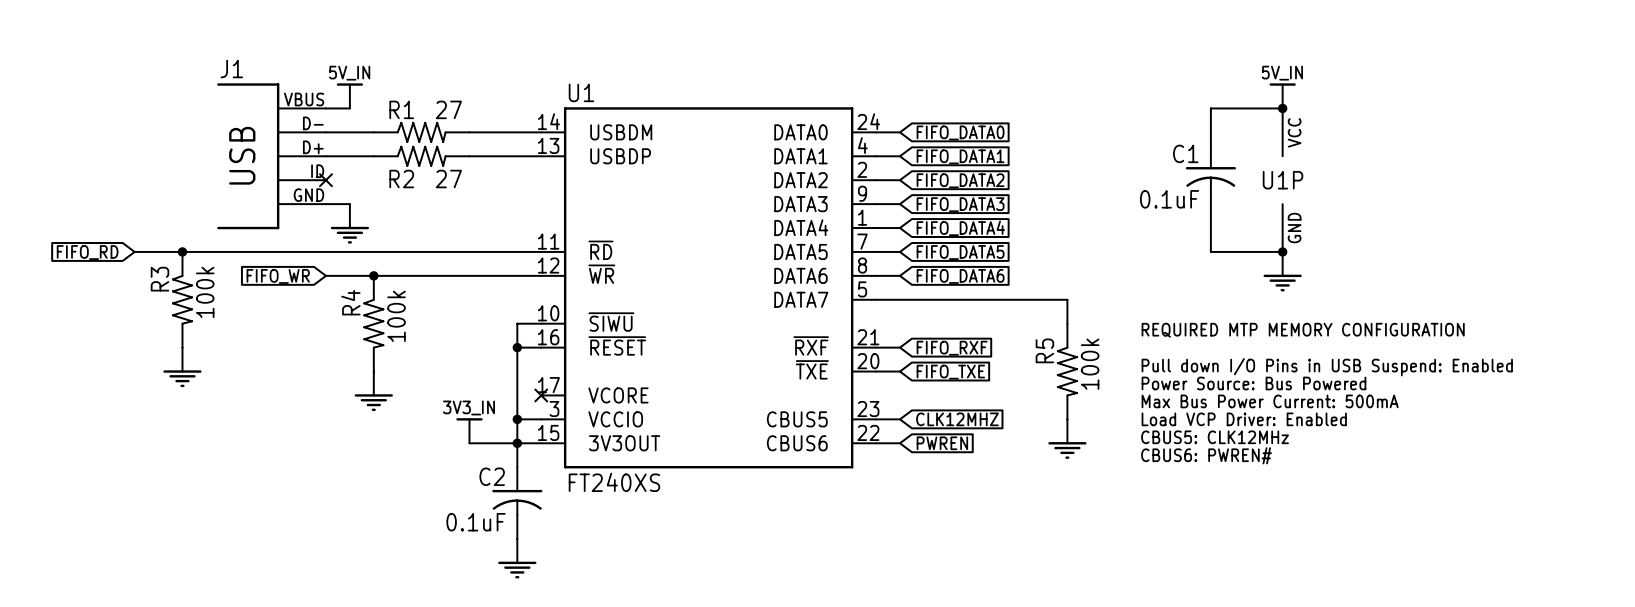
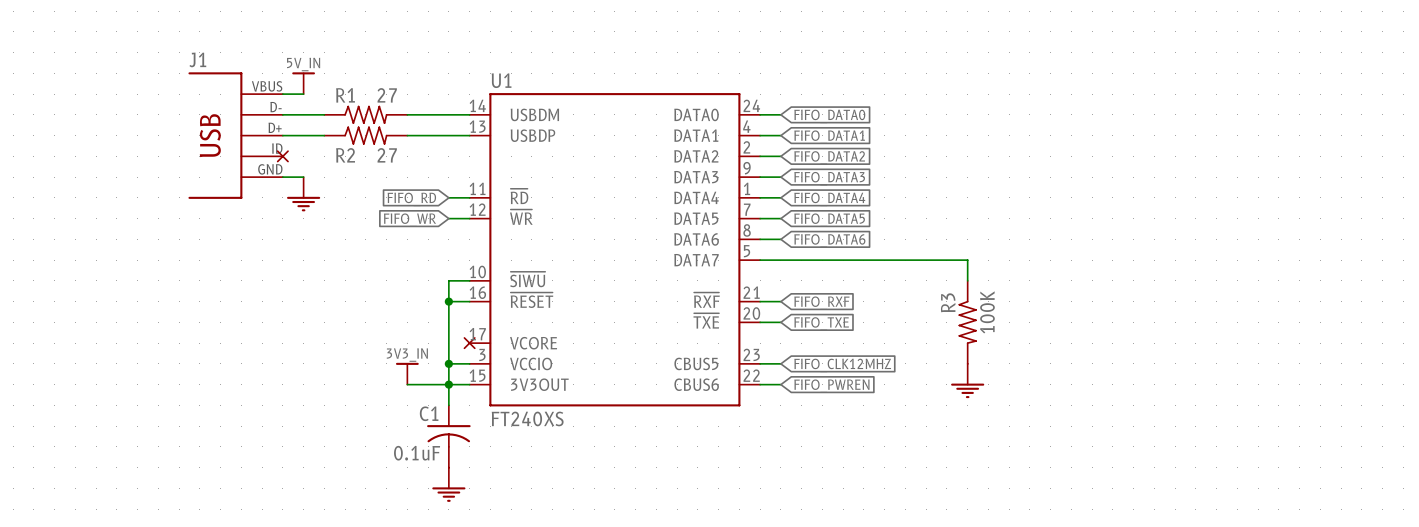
power symbol: 5V_IN (1282, 95) -> none
U1 symbol: [541, 107, 877, 469] -> [469, 93, 761, 407]
wire: (1282, 108) (1210, 108) (1210, 144) -> none
junction: (1282, 108) -> none
C1: 0.1uF (1210, 180) -> none
U1P: (1282, 180) -> none
wire: (1210, 216) (1210, 251) (1282, 251) -> none
global label: none -> FIFO_RD (411, 199)
wire: none -> (448, 197) (469, 197)
wire: (134, 251) (517, 251) -> none
junction: (182, 251) -> none
junction: (1282, 251) -> none
global label: FIFO_RD (87, 252) -> none
power symbol: (1282, 271) -> none
wire: (325, 275) (541, 275) -> none
junction: (373, 275) -> none
global label position: FIFO_WR (278, 276) -> FIFO_WR (409, 220)
R3 value: 100k (205, 292) -> 100K (987, 312)
R3 position: (182, 299) -> (967, 322)
wire: (1067, 299) (1067, 323) -> (926, 260) (967, 260) (967, 280)
R4: 100k (373, 323) -> none
text: REQUIRED MTP MEMORY CONFIGURATION (1303, 330) -> none
power symbol: (182, 367) -> none
text: Pull down I/O Pins in USB Suspend: Enabled (1327, 367) -> none
R5: 100k (1067, 371) -> none
text: Power Source: Bus Powered (1253, 383) -> none
power symbol: (373, 391) -> none
text: Max Bus Power Current: 500mA (1270, 401) -> none
global label: CLK12MHZ (957, 419) -> FIFO_CLK12MHZ (842, 365)
text: Load VCP Driver: Enabled (1244, 419) -> none
text: CBUS5: CLK12MHz (1215, 437) -> none
power symbol position: (1067, 439) -> (967, 380)
global label: PWREN (942, 443) -> FIFO_PWREN (831, 386)
text: CBUS6: PWREN# (1206, 455) -> none
C2 name: C2 (492, 476) -> C1 (429, 413)

